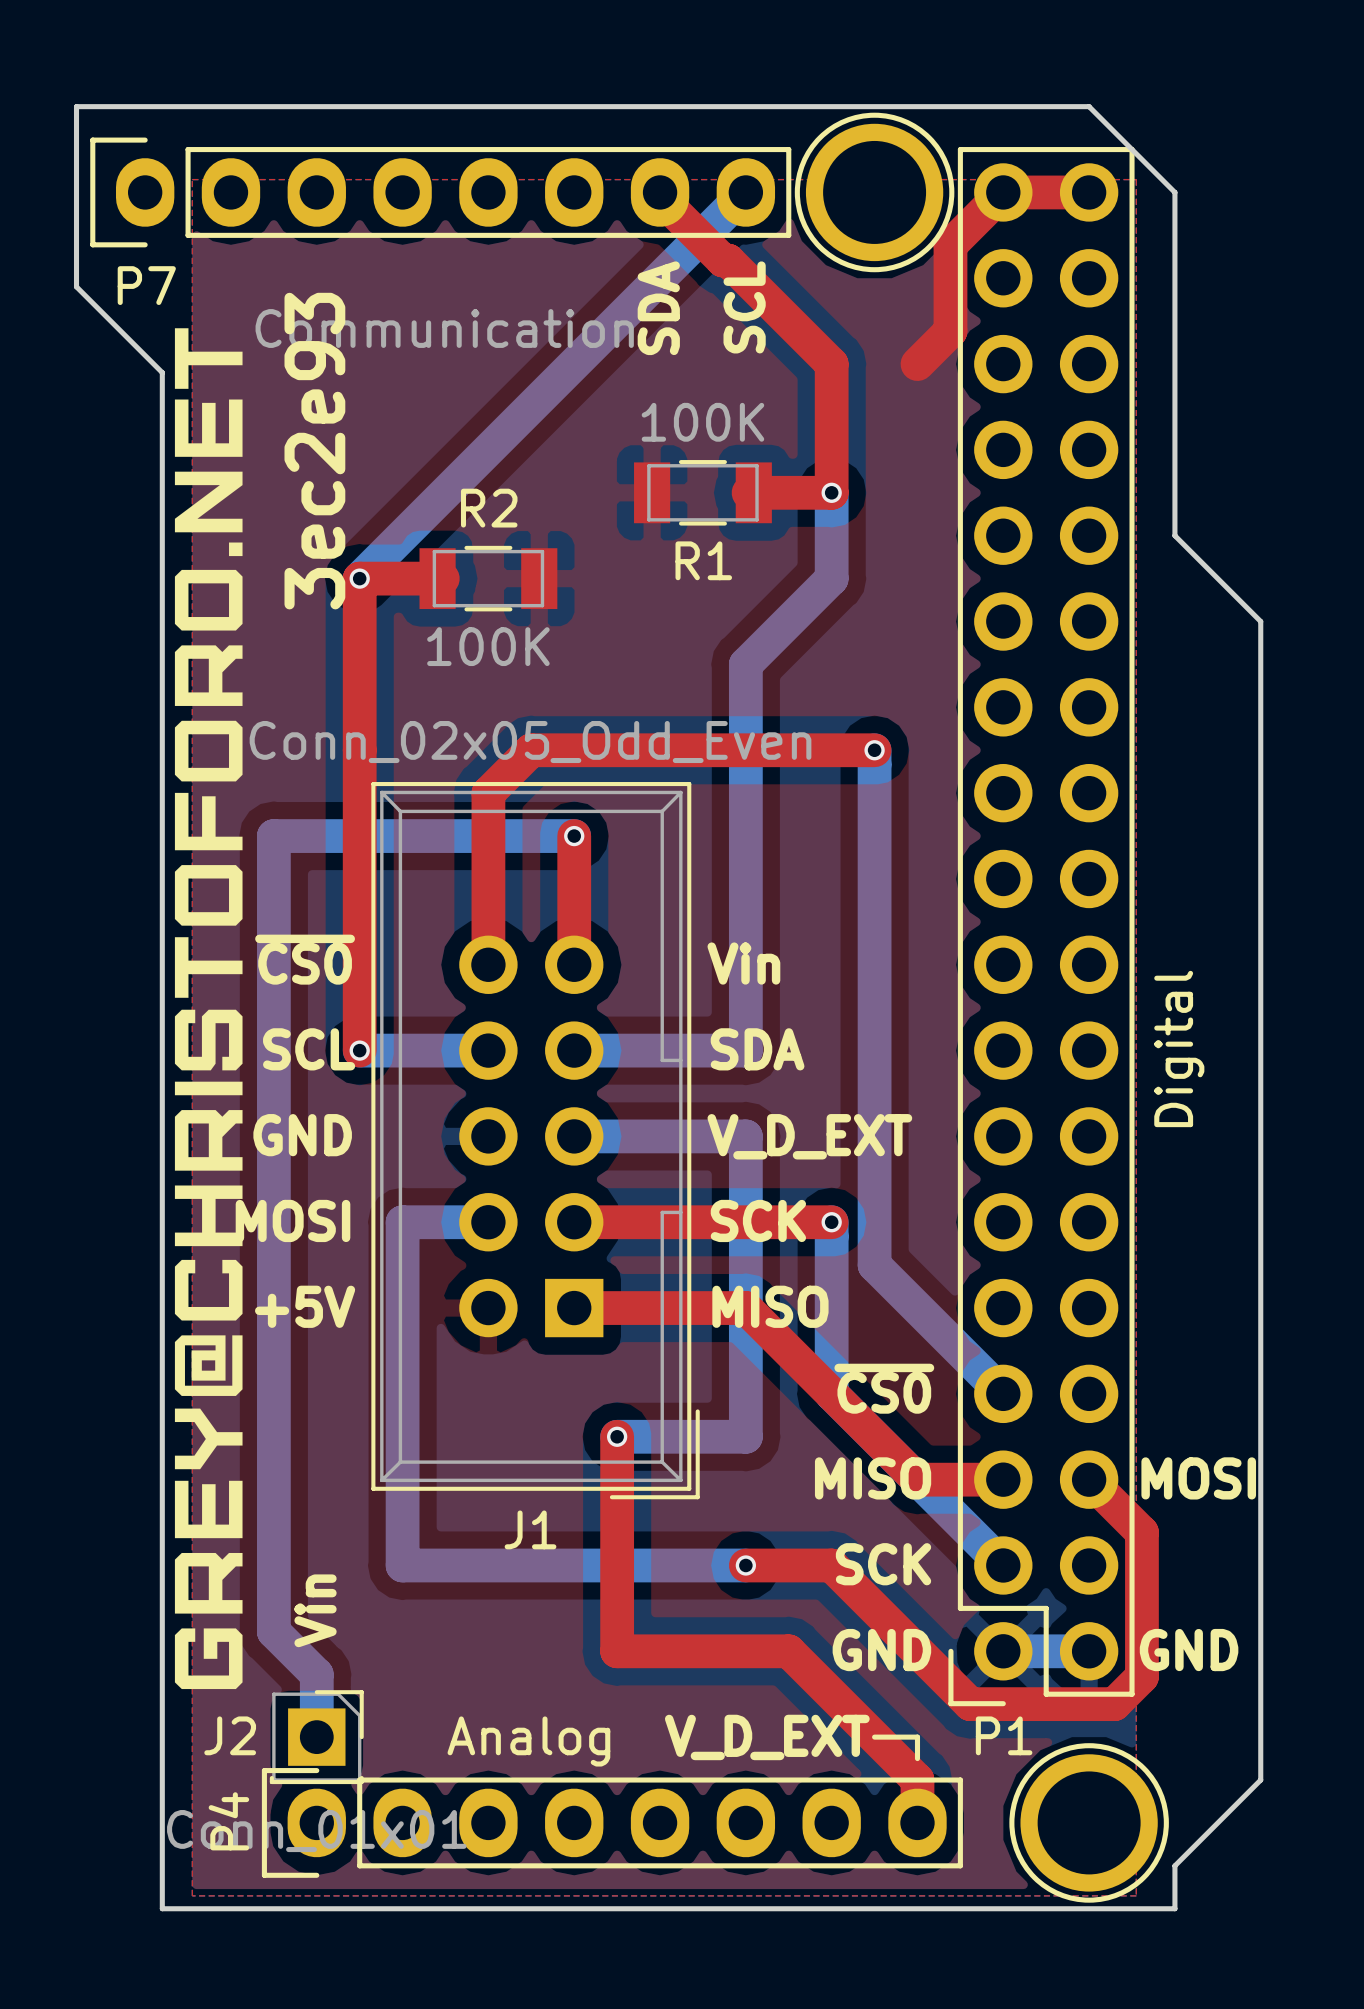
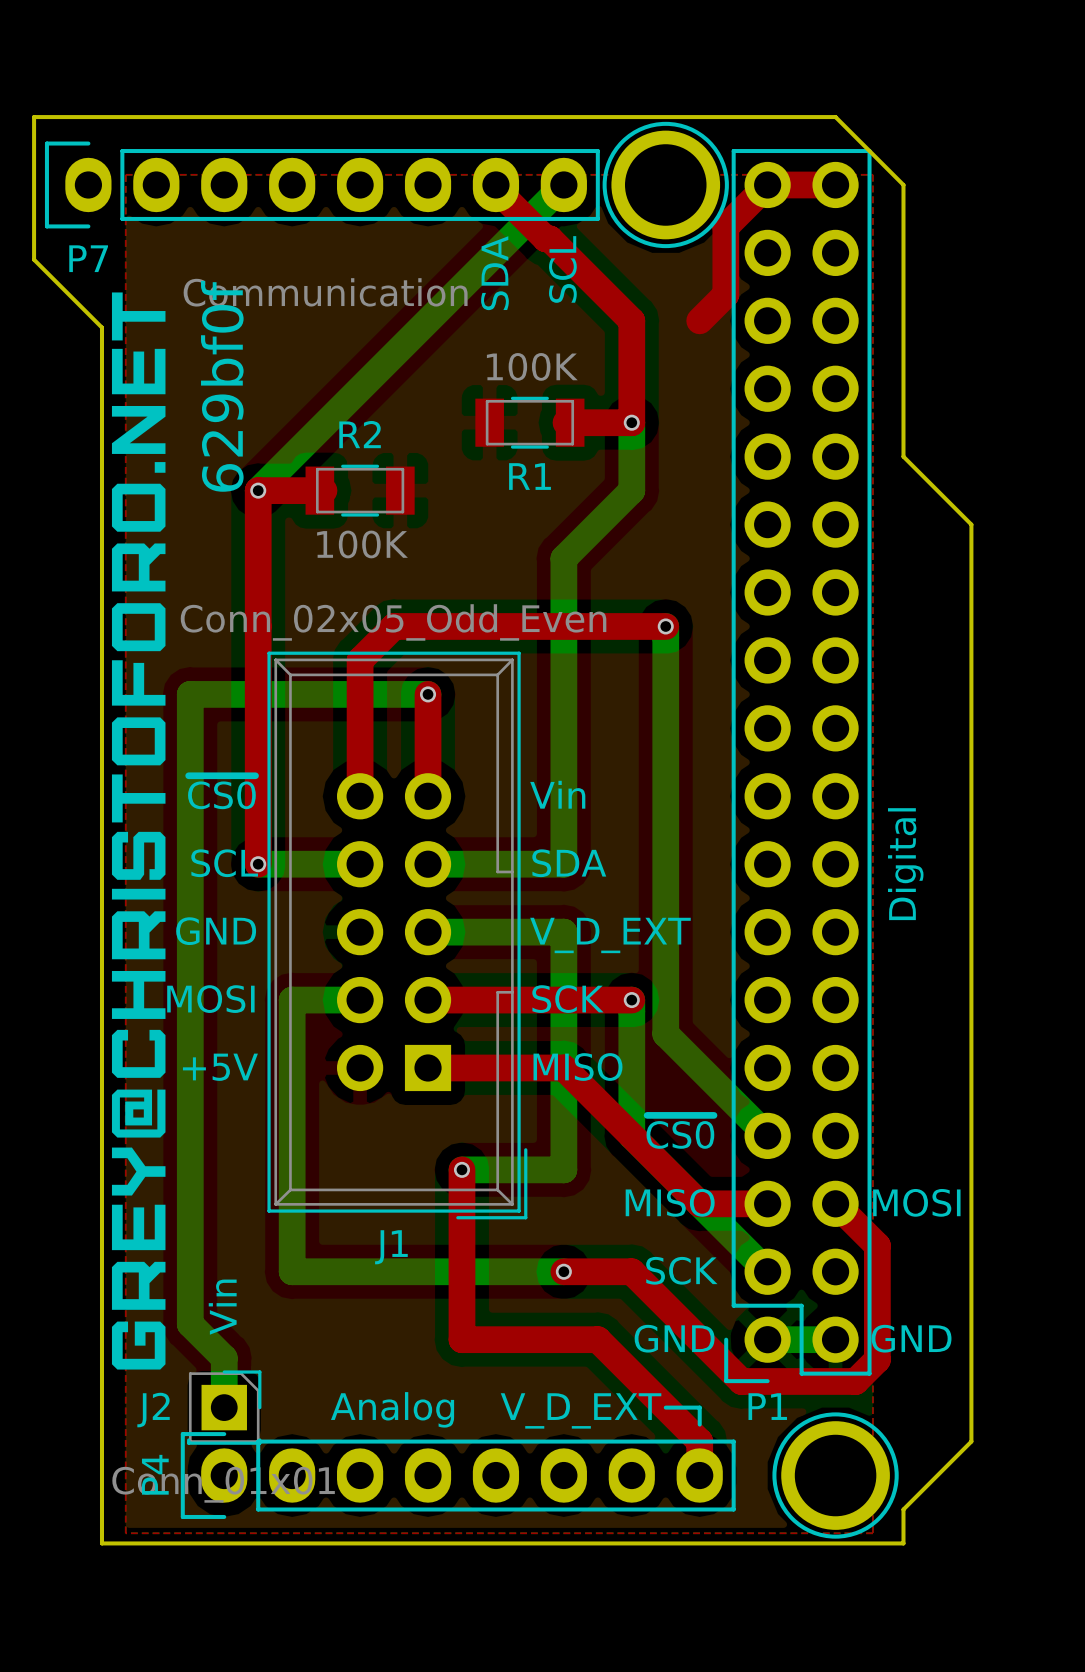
text: 3ec2e93 (314, 451) -> 629bf0f (222, 386)

